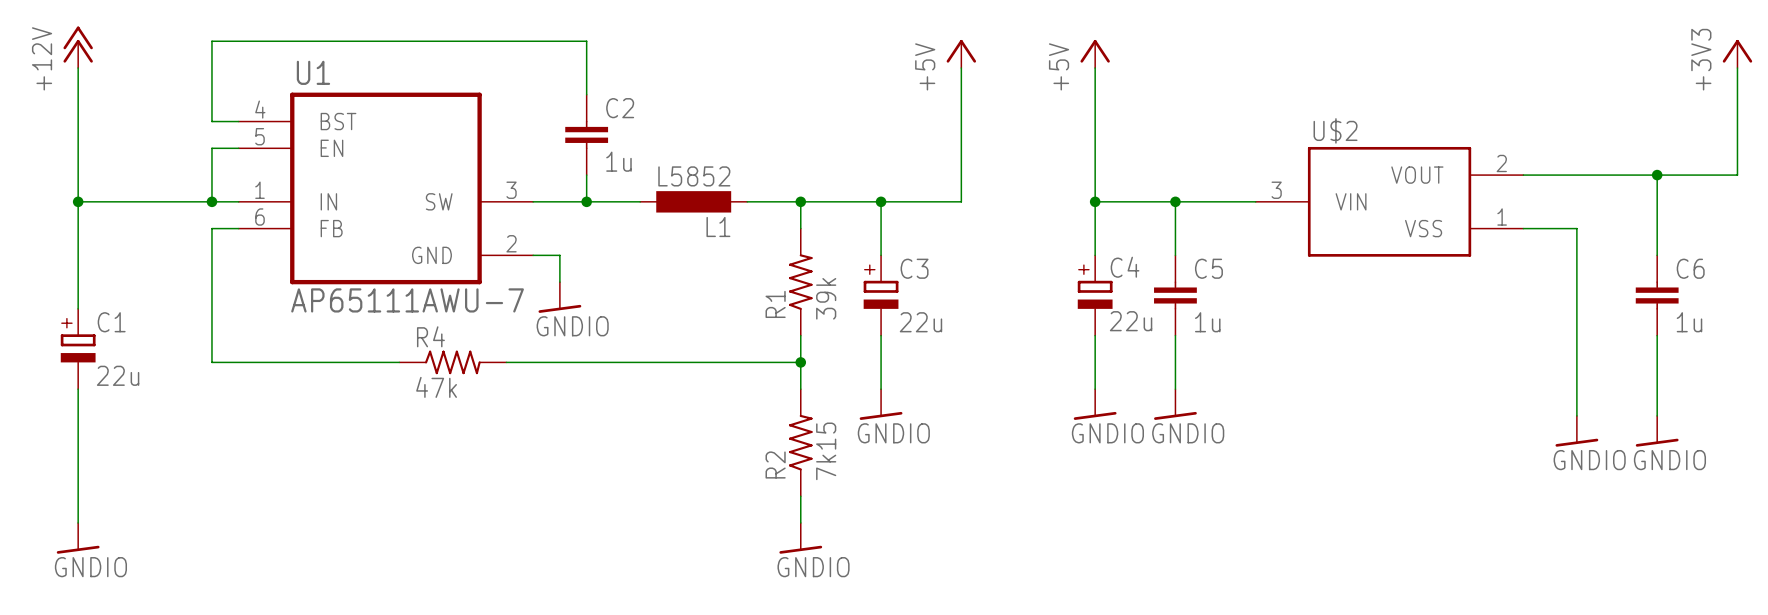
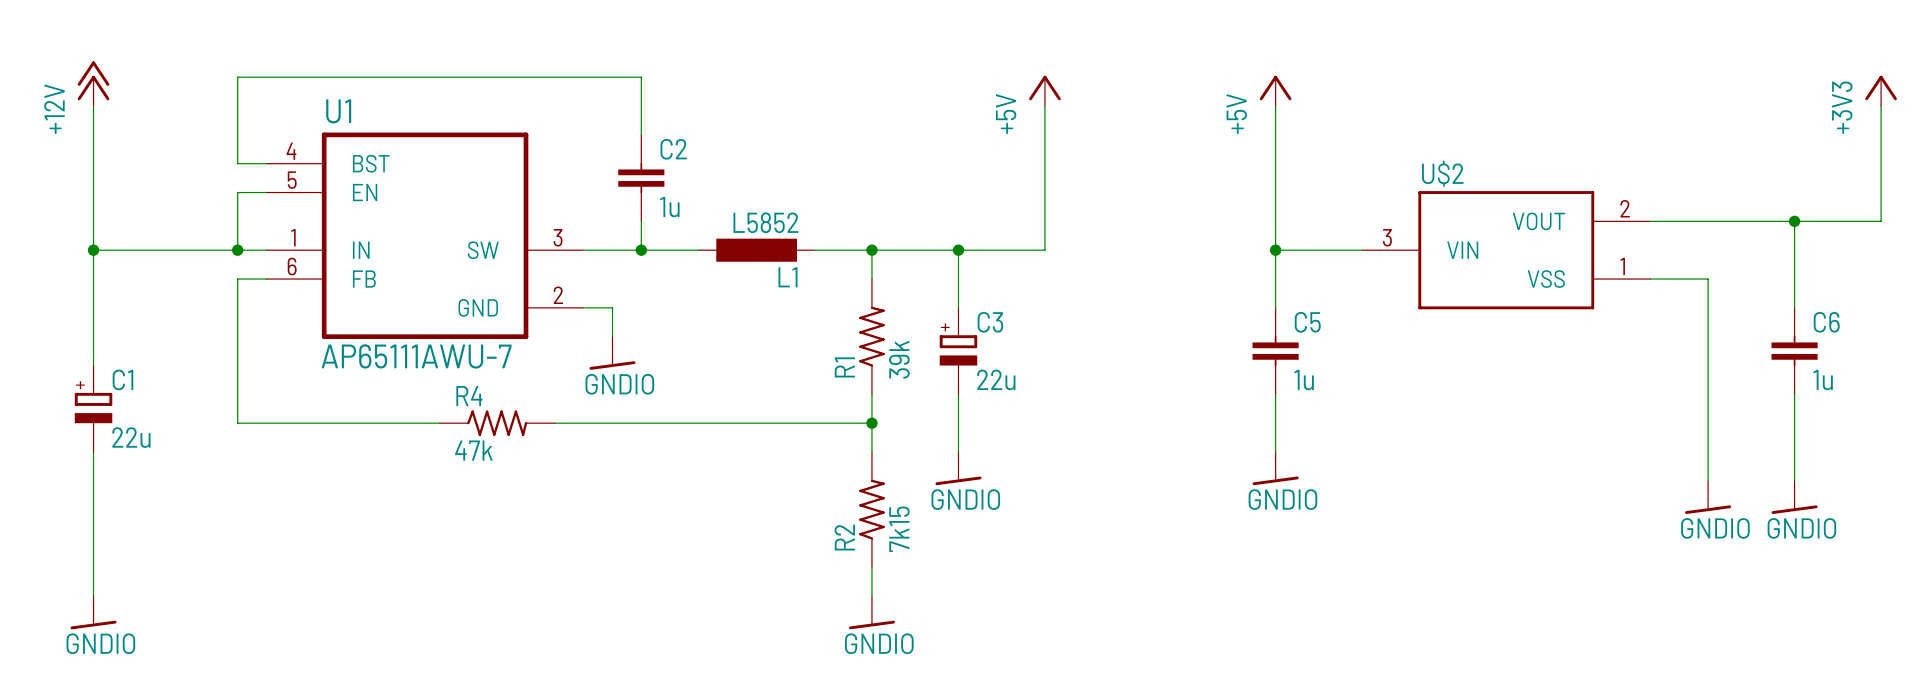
power symbol position: +5V (1095, 53) -> +5V (1275, 90)
wire: (1095, 68) (1095, 255) -> none
wire: (1095, 201) (1175, 201) -> (1275, 106) (1275, 250)
junction: (1095, 201) -> none
C4: 22u (1095, 295) -> none
wire: (1095, 335) (1095, 389) -> none
power symbol: GNDIO (1095, 404) -> none

